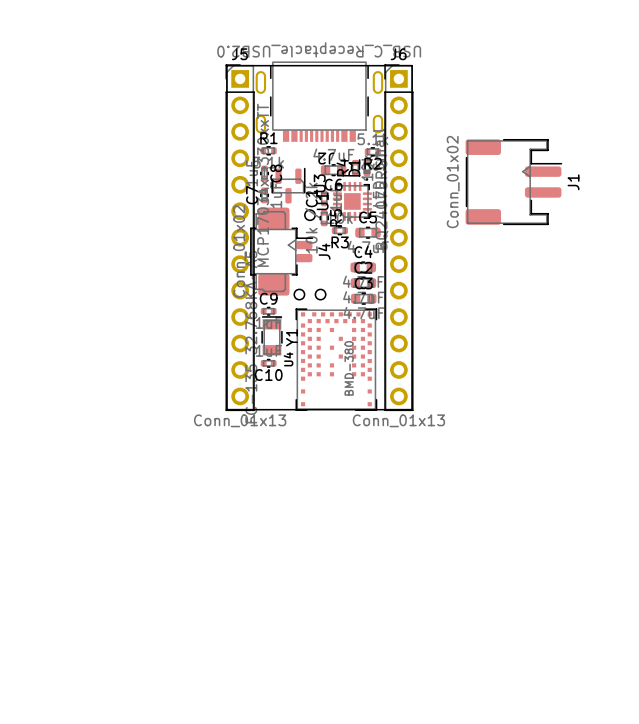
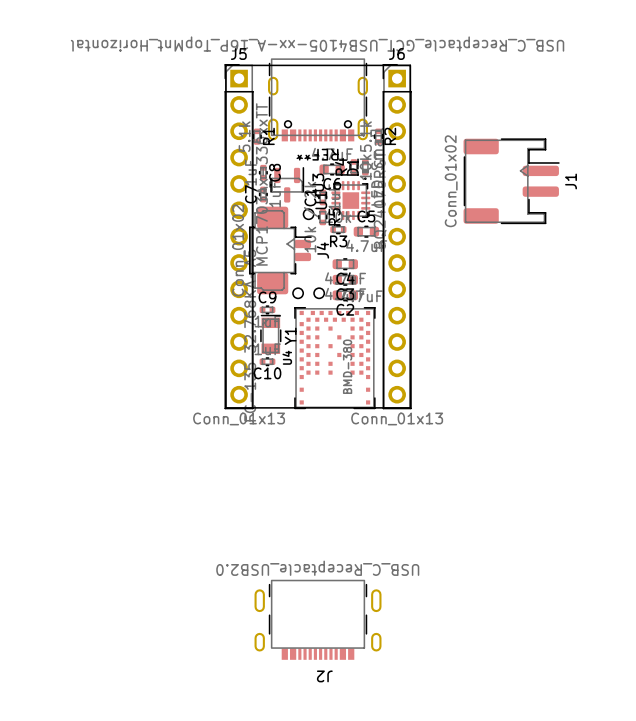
REF**: none -> USB_C_Receptacle_GCT_USB4105-xx-A_16P_TopMnt_Horizontal (318, 99)
J2 position: (319, 101) -> (318, 619)
R1 rotation: 0° (268, 150) -> 90° clockwise (257, 136)
R1 position: (268, 150) -> (257, 136)
R2 rotation: 0° (372, 151) -> 90° clockwise (378, 136)
R2 position: (372, 151) -> (378, 136)
C4 name position: C4 (363, 251) -> C4 (345, 278)
C2 name position: C2 (363, 267) -> C2 (345, 309)
C4 position: (363, 267) -> (345, 264)
C2 position: (363, 283) -> (345, 295)
C3 name position: C3 (363, 283) -> C3 (345, 294)
C3 position: (363, 298) -> (345, 279)

